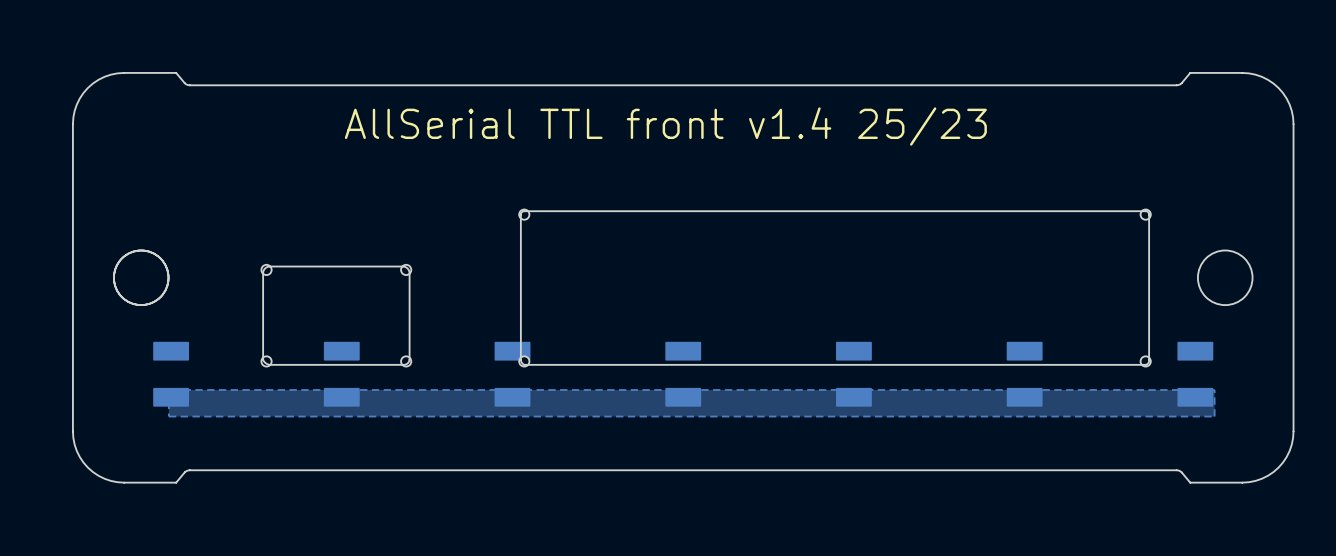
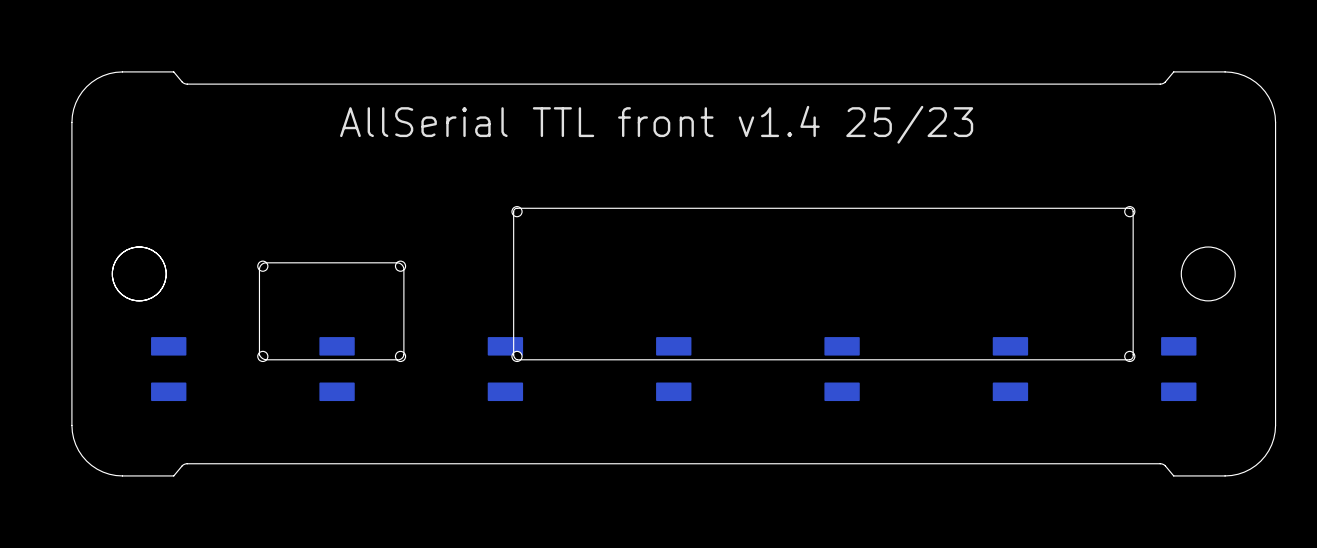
zone outline: (1214, 390) (1214, 416) (168, 416) (168, 390) (1214, 390) -> none

